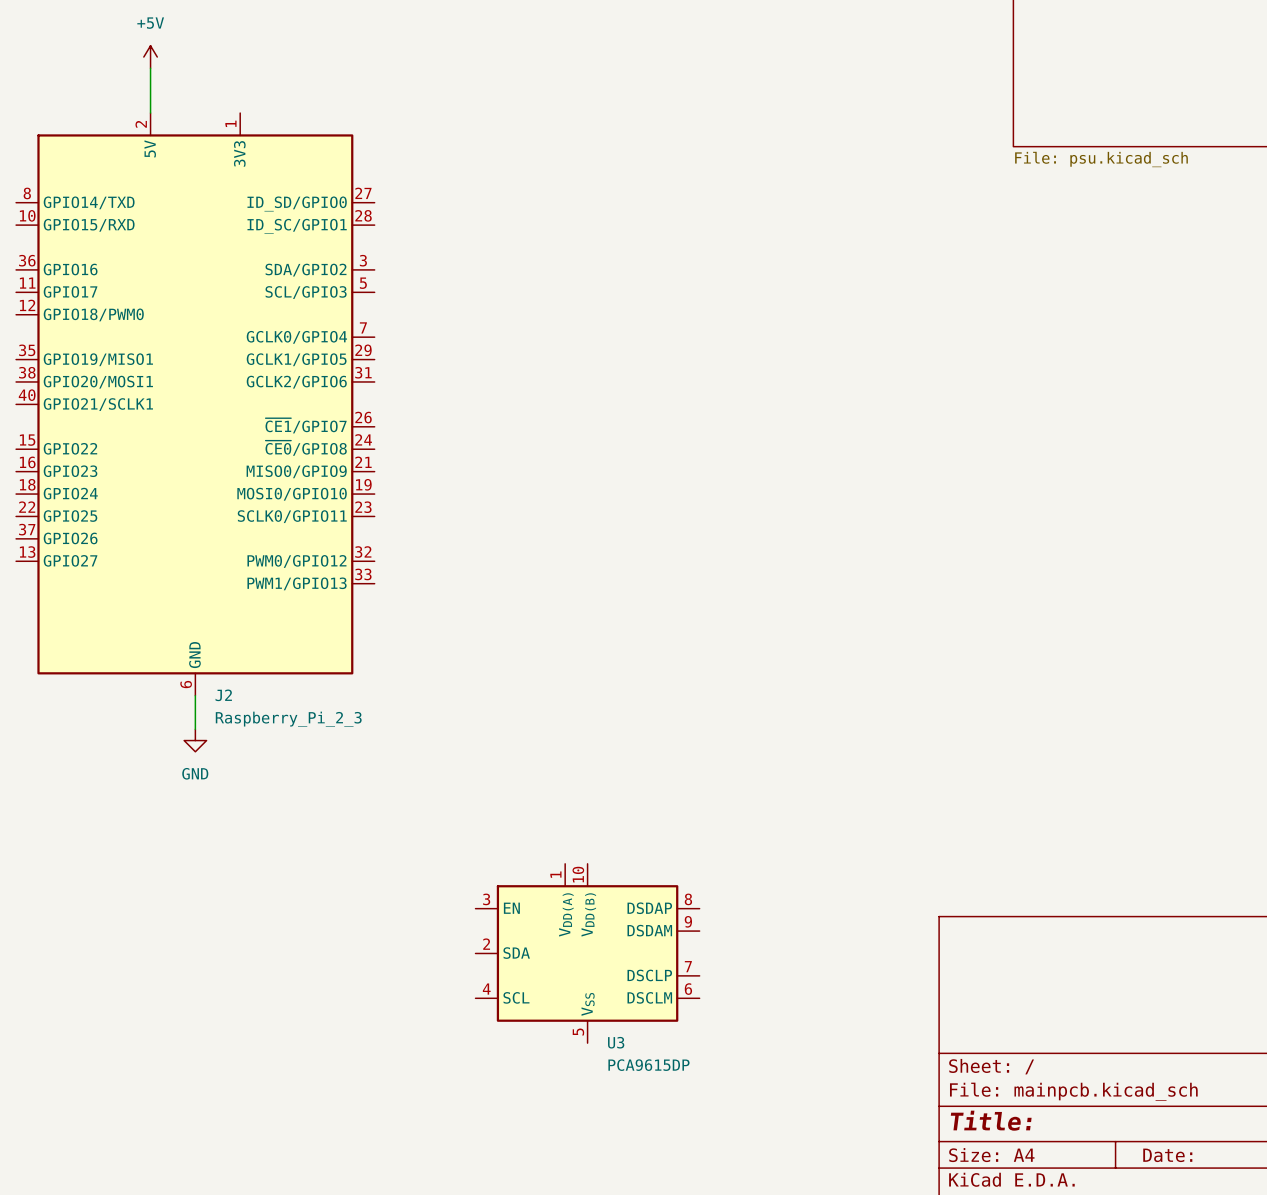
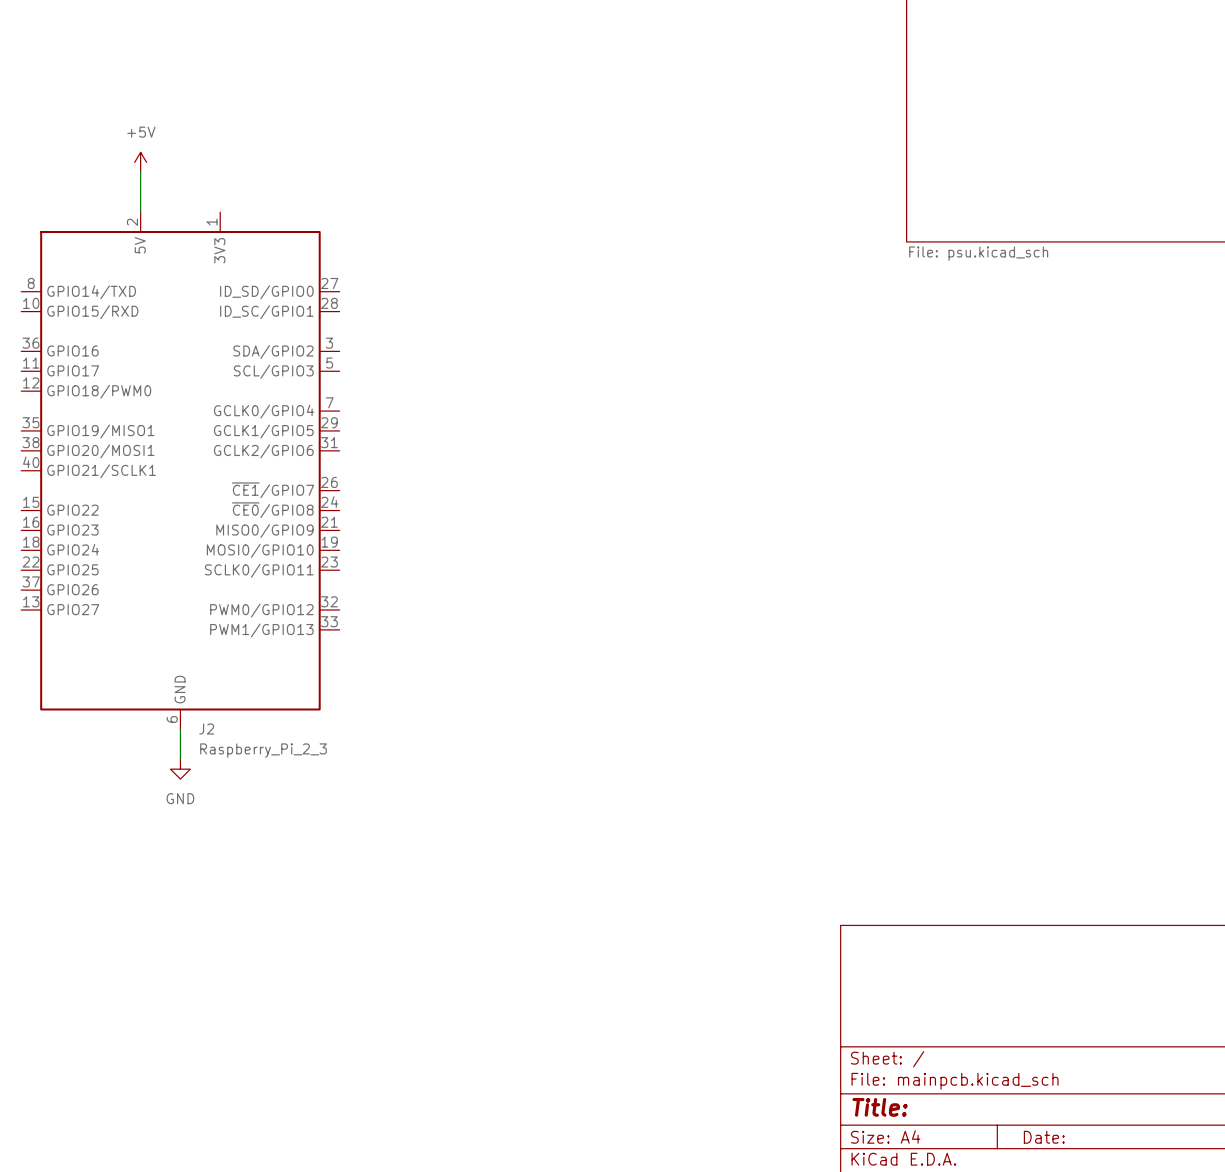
U3: PCA9615DP (587, 953) -> none

